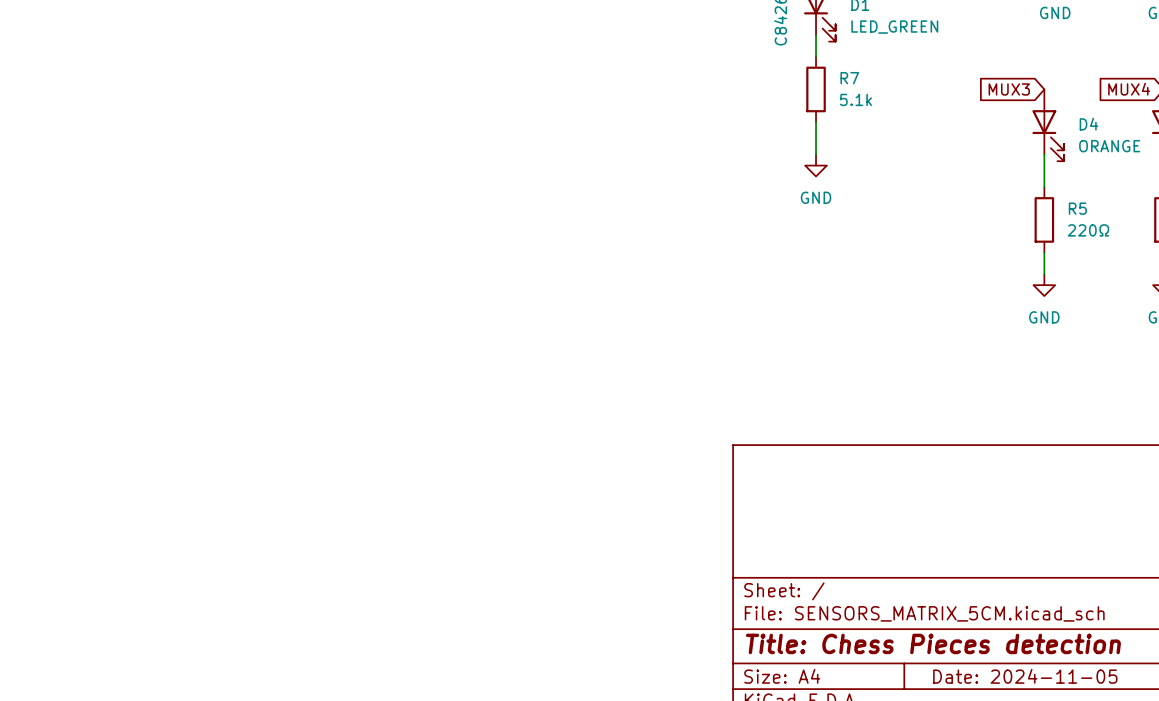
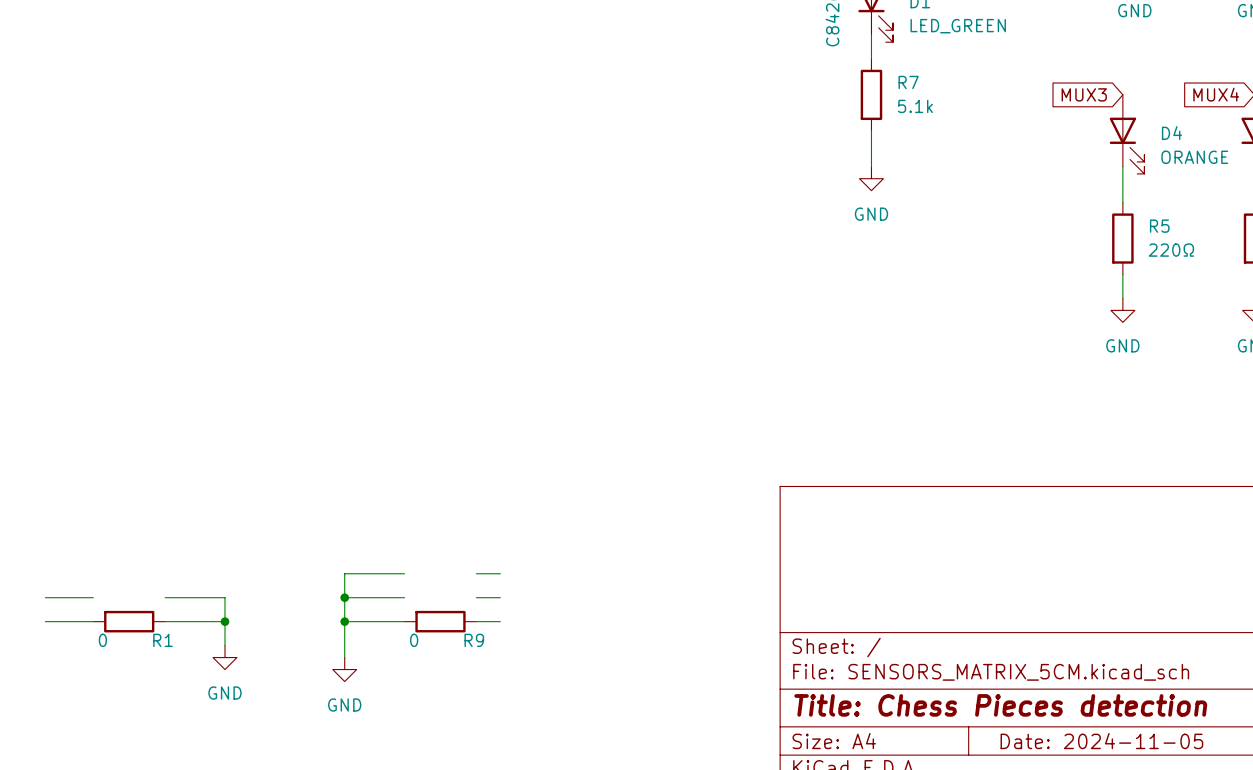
wire: none -> (404, 573) (344, 573) (344, 657)
wire: none -> (476, 573) (500, 573)
wire: none -> (45, 597) (93, 597)
wire: none -> (165, 597) (224, 597) (224, 645)
wire: none -> (344, 597) (404, 597)
junction: none -> (344, 597)
wire: none -> (476, 597) (500, 597)
wire: none -> (45, 621) (93, 621)
R1: none -> 0 (129, 621)
wire: none -> (165, 621) (224, 621)
junction: none -> (224, 621)
wire: none -> (344, 621) (404, 621)
junction: none -> (344, 621)
R9: none -> 0 (440, 621)
wire: none -> (476, 621) (500, 621)
power symbol: none -> GND (224, 657)
power symbol: none -> GND (344, 669)

